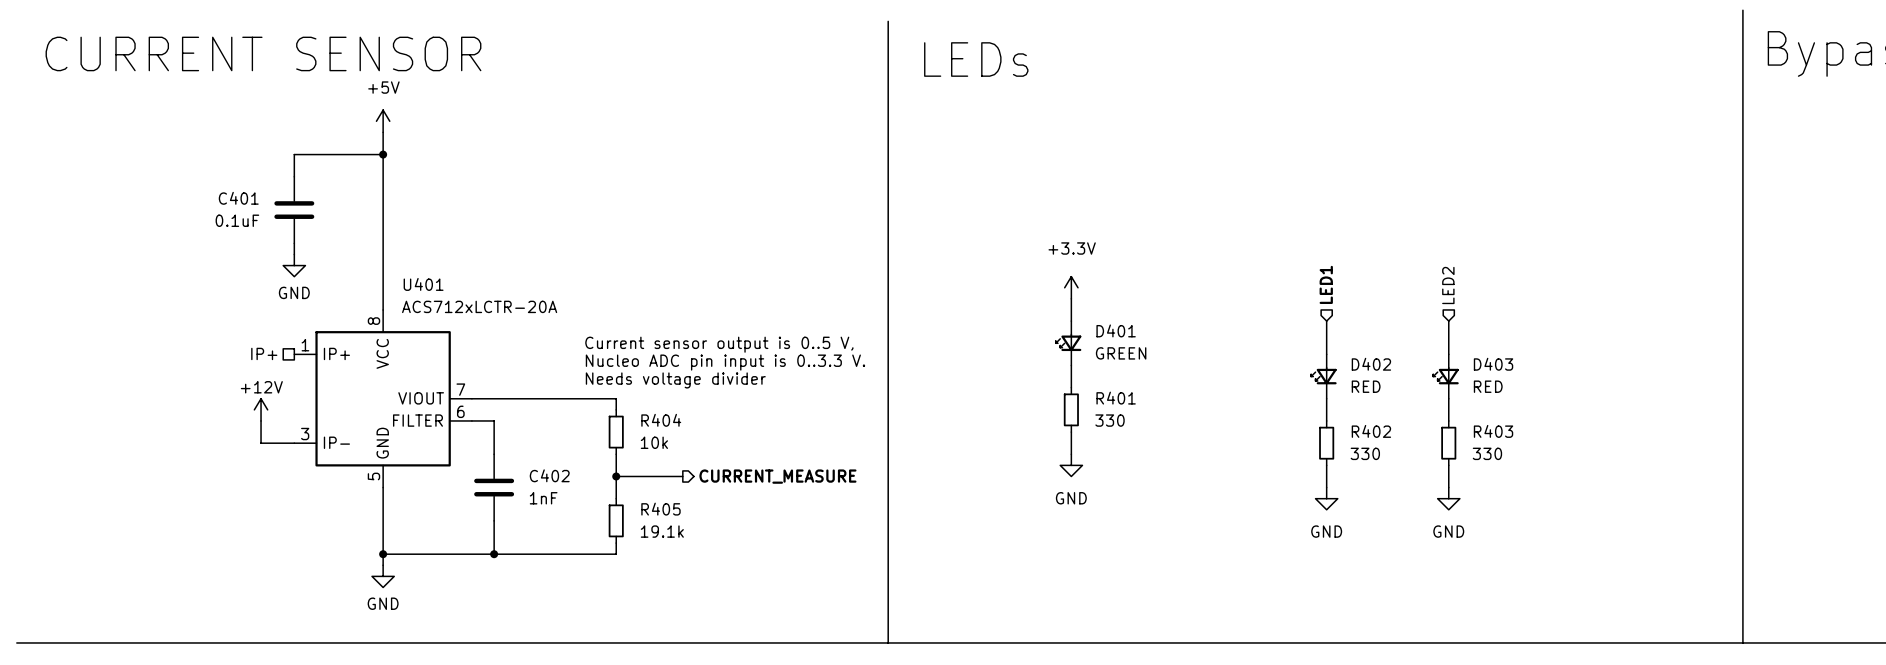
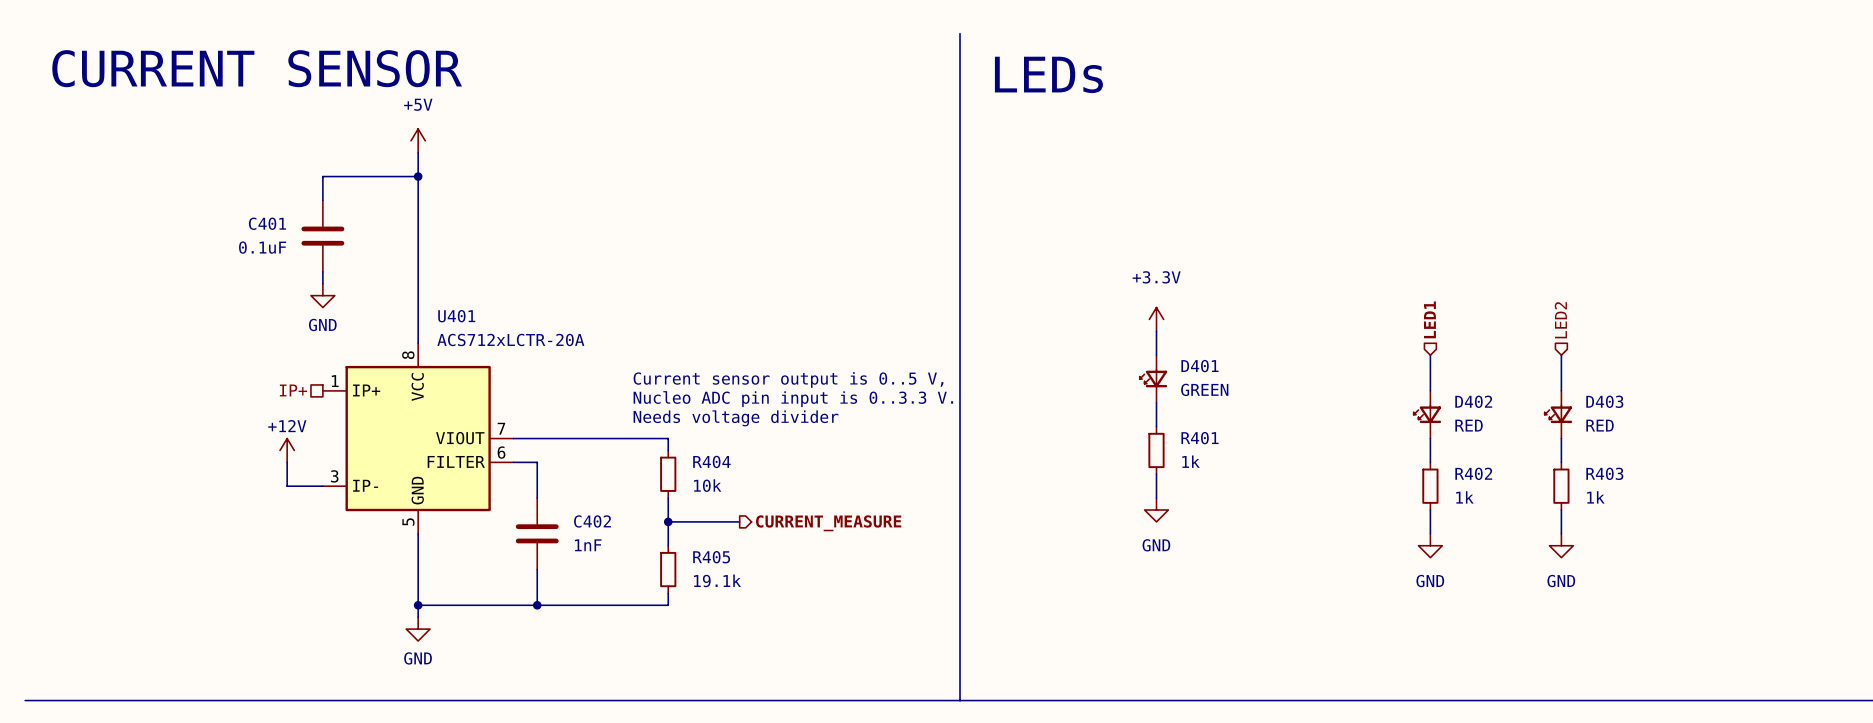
R401 value: 330 (1110, 420) -> 1k (1191, 461)
R402 value: 330 (1365, 453) -> 1k (1464, 497)
R403 value: 330 (1487, 453) -> 1k (1595, 497)

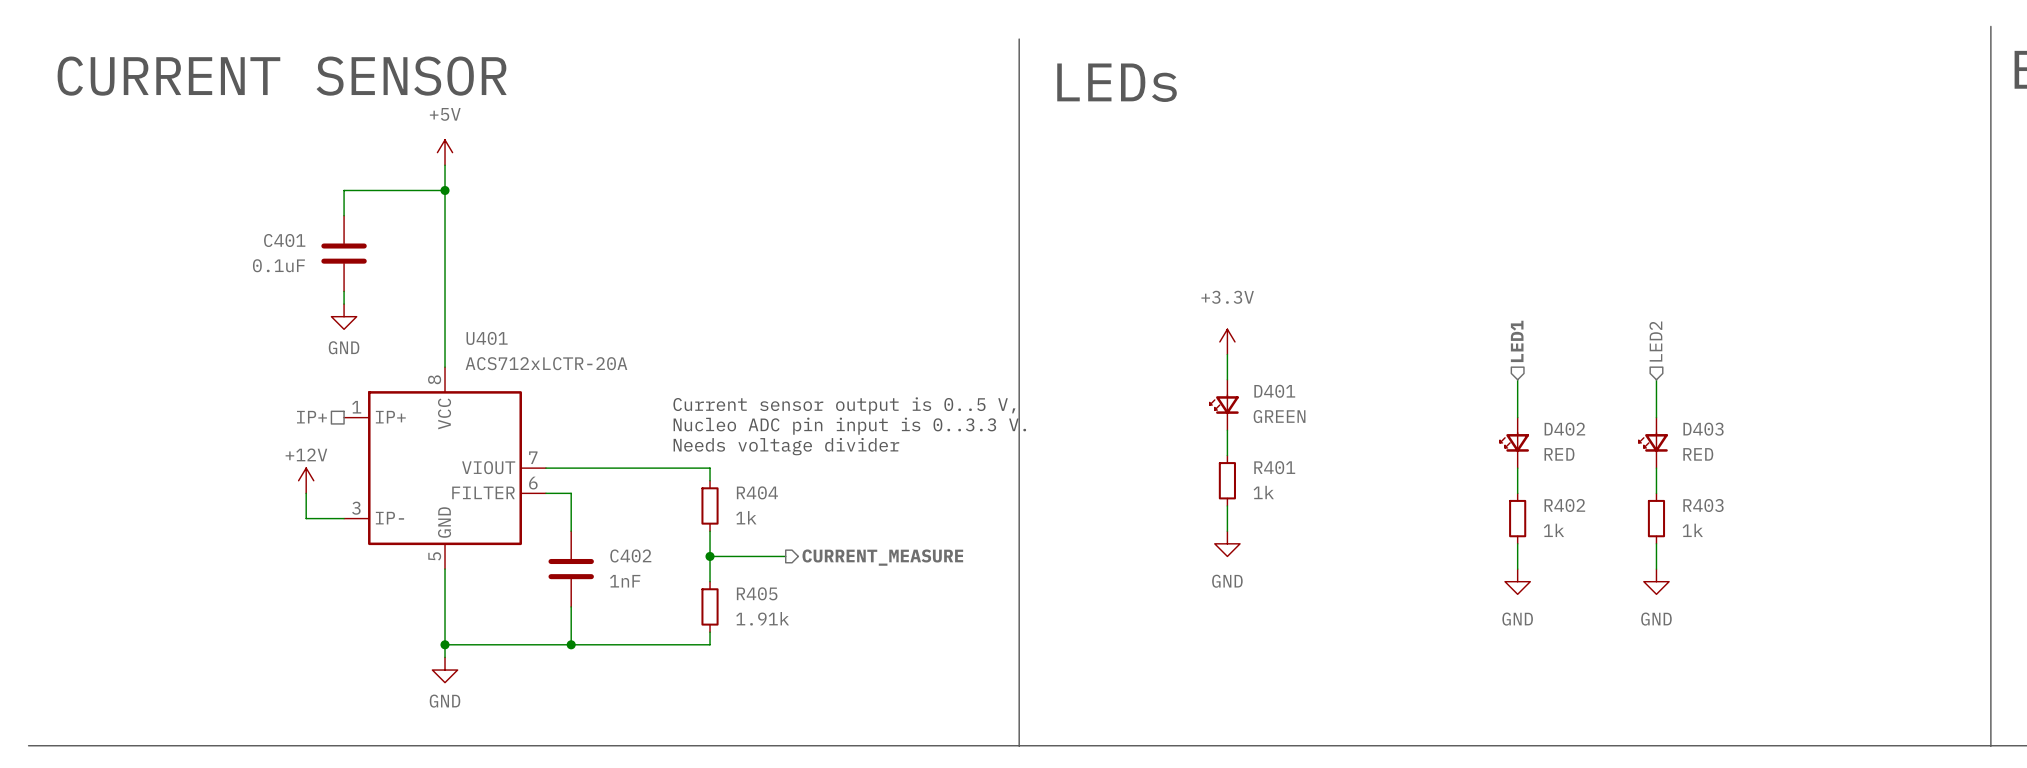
R404 value: 10k (707, 485) -> 1k (746, 517)
R405 value: 19.1k (717, 580) -> 1.91k (762, 618)

